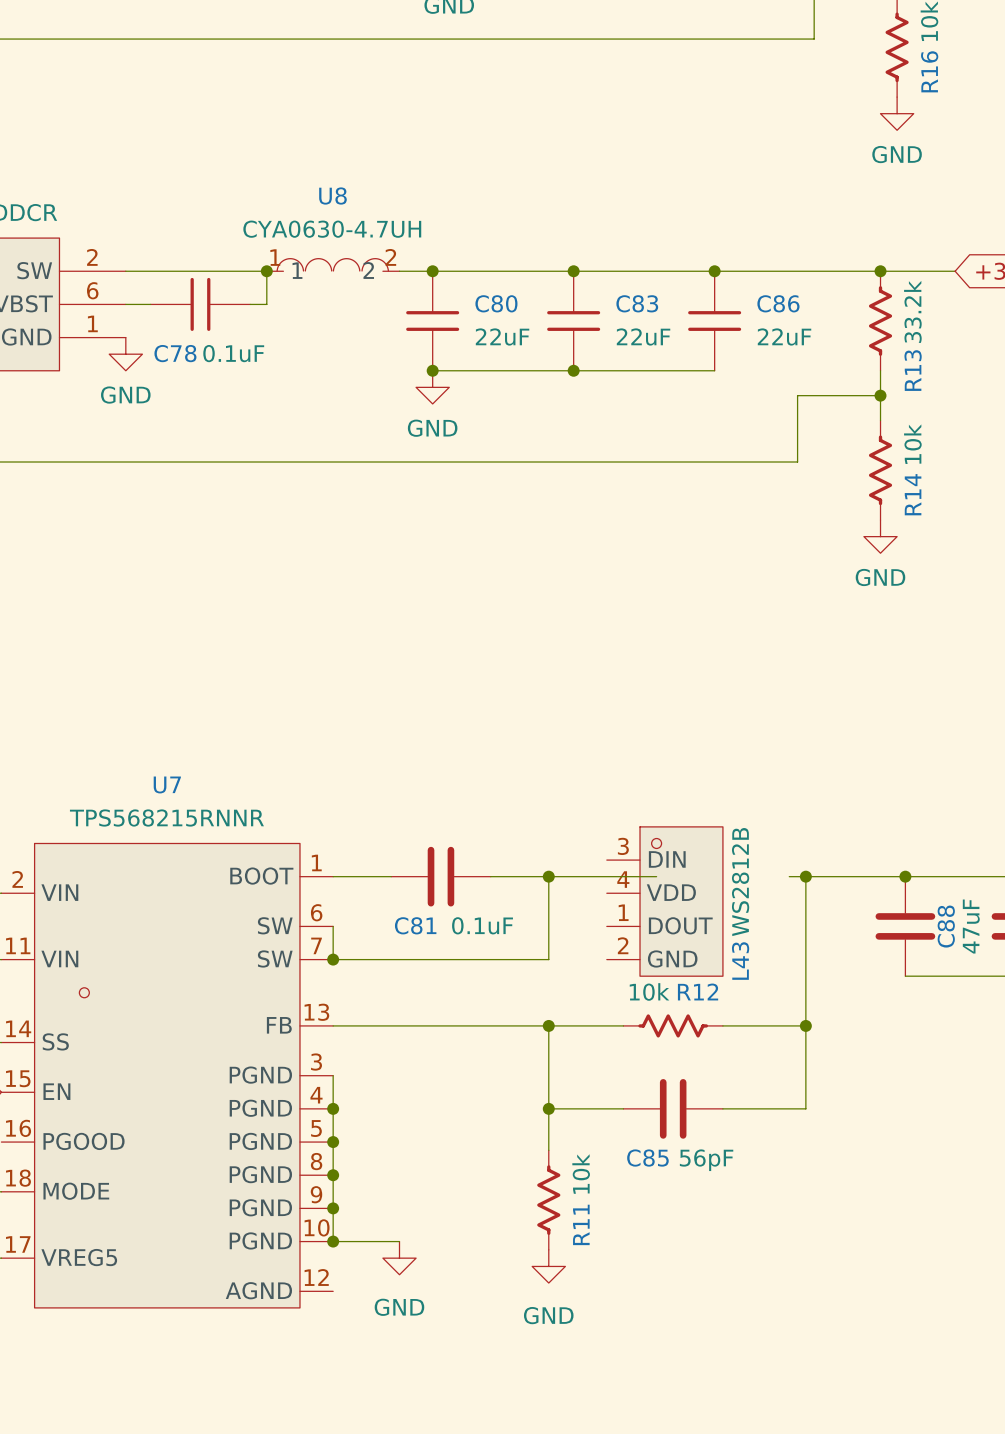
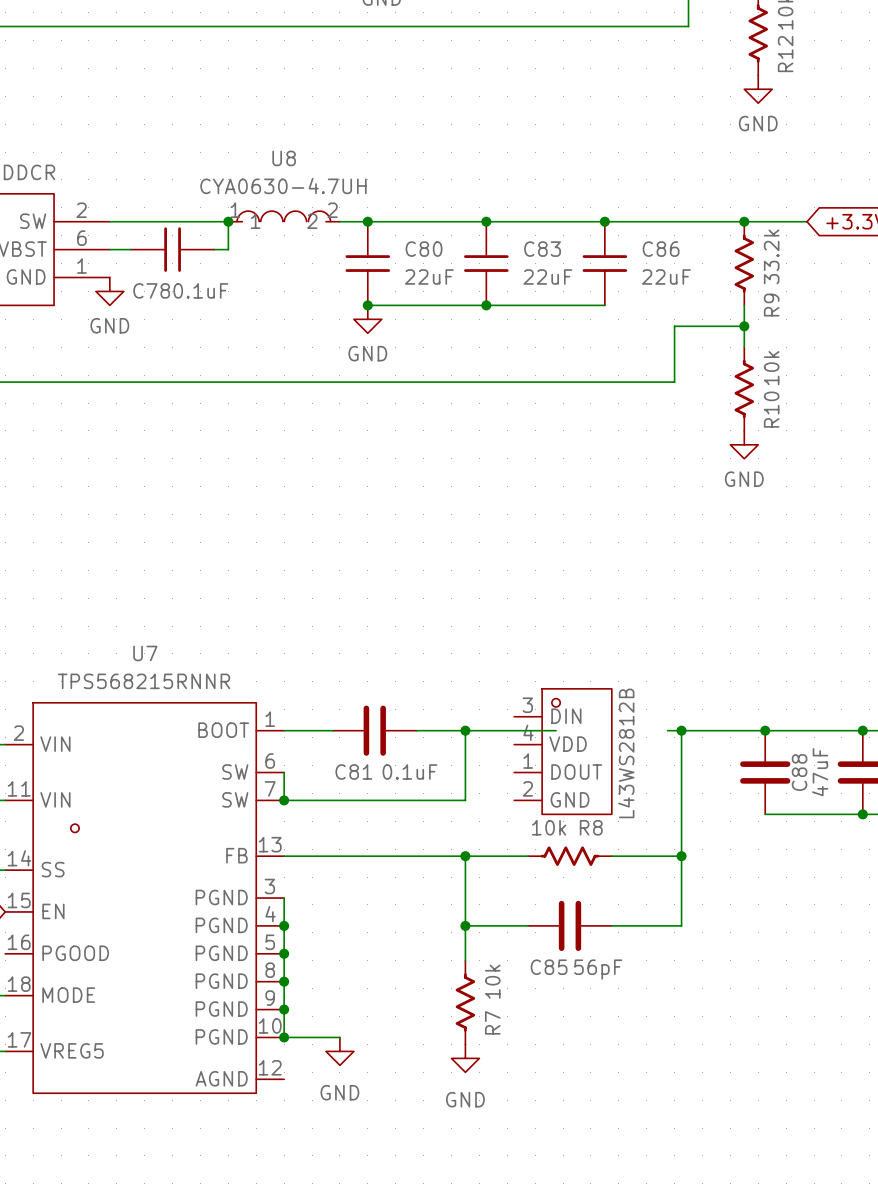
R16 name: R16 (929, 71) -> R12 (785, 54)
R13 name: R13 (913, 370) -> R9 (771, 305)
R14 name: R14 (913, 494) -> R10 (771, 409)
R12 name: R12 (698, 992) -> R8 (591, 827)
R11 name: R11 (581, 1224) -> R7 (492, 1022)

